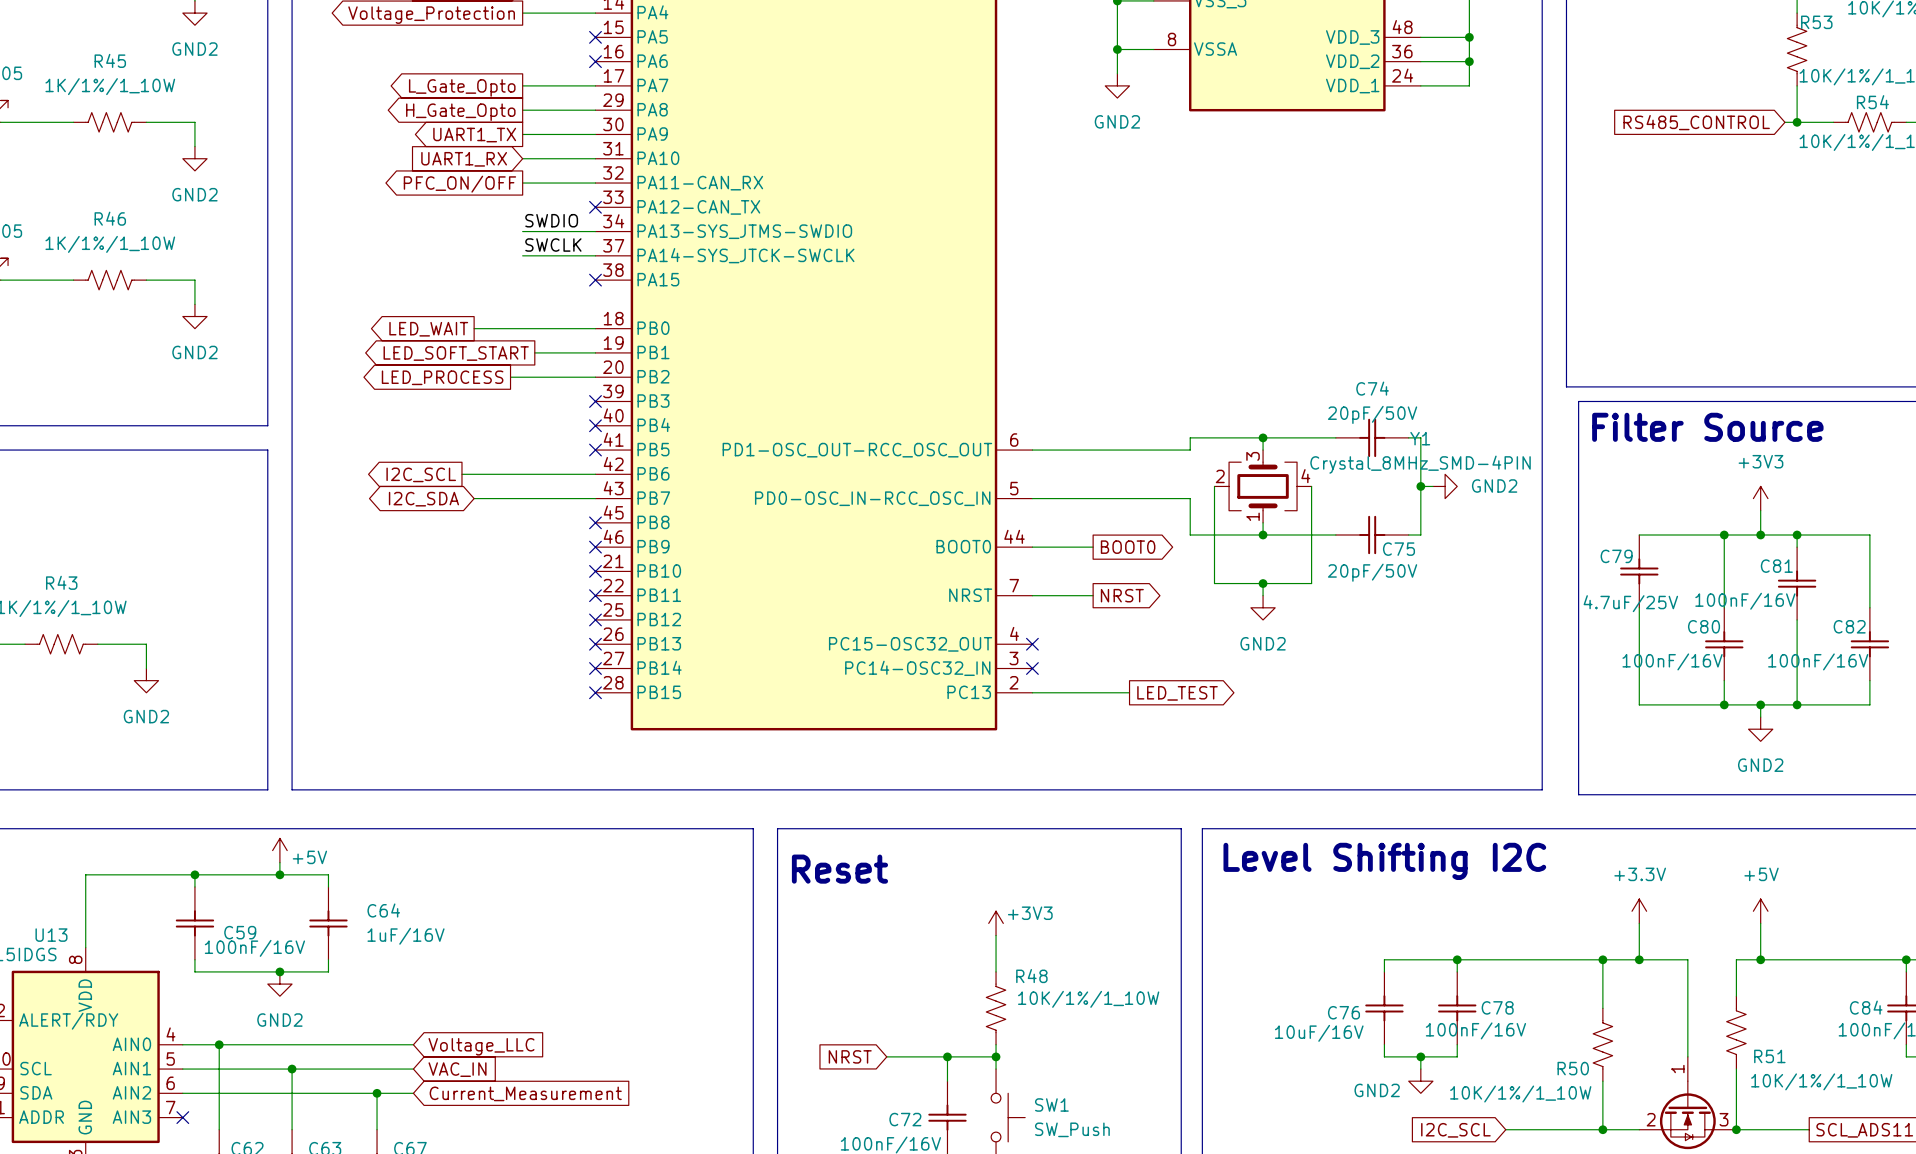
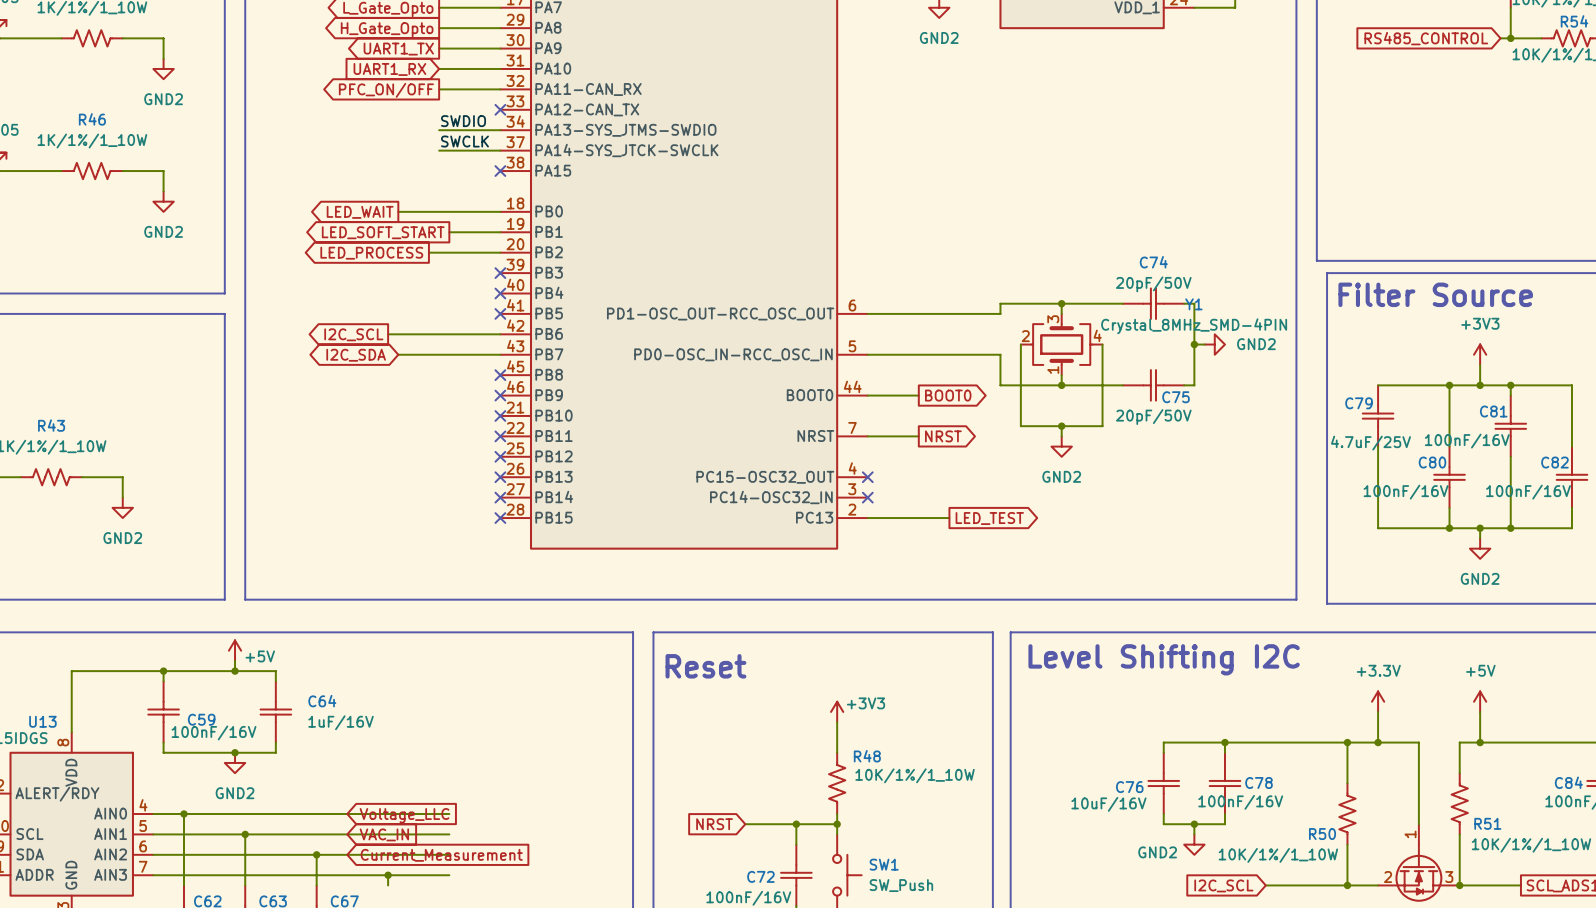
wire: none -> (347, 814) (449, 814)
wire: none -> (347, 834) (449, 834)
wire: none -> (347, 854) (449, 854)
wire: none -> (153, 875) (449, 875)
no-connect mark: (182, 1117) -> none
wire: none -> (388, 875) (388, 885)
junction: none -> (388, 875)

